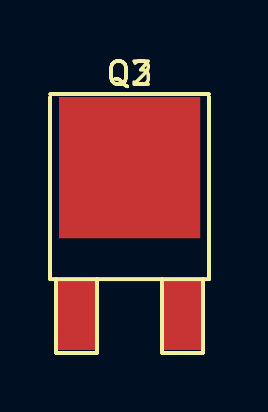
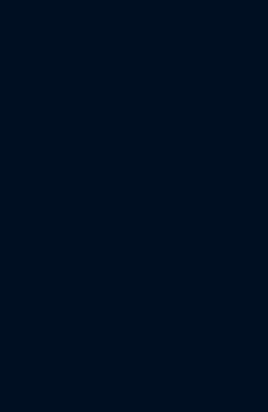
part: (129, 223) -> none
part: (129, 223) -> none

